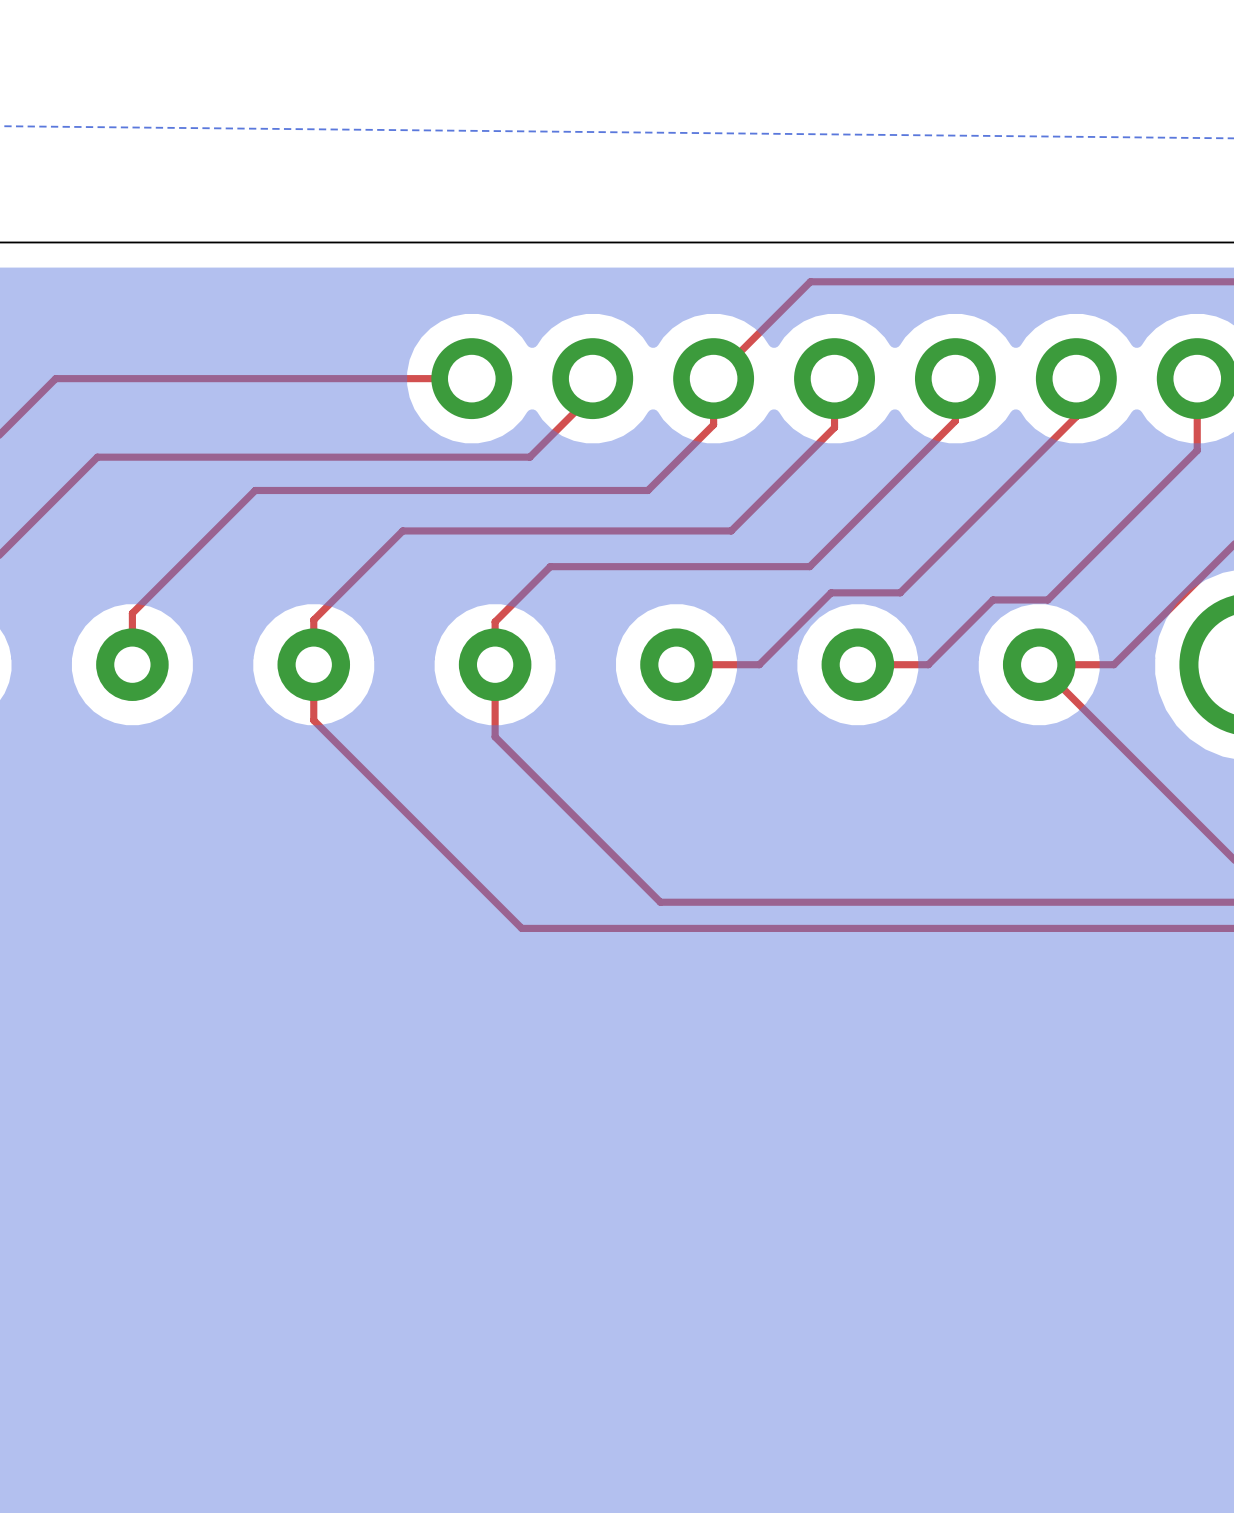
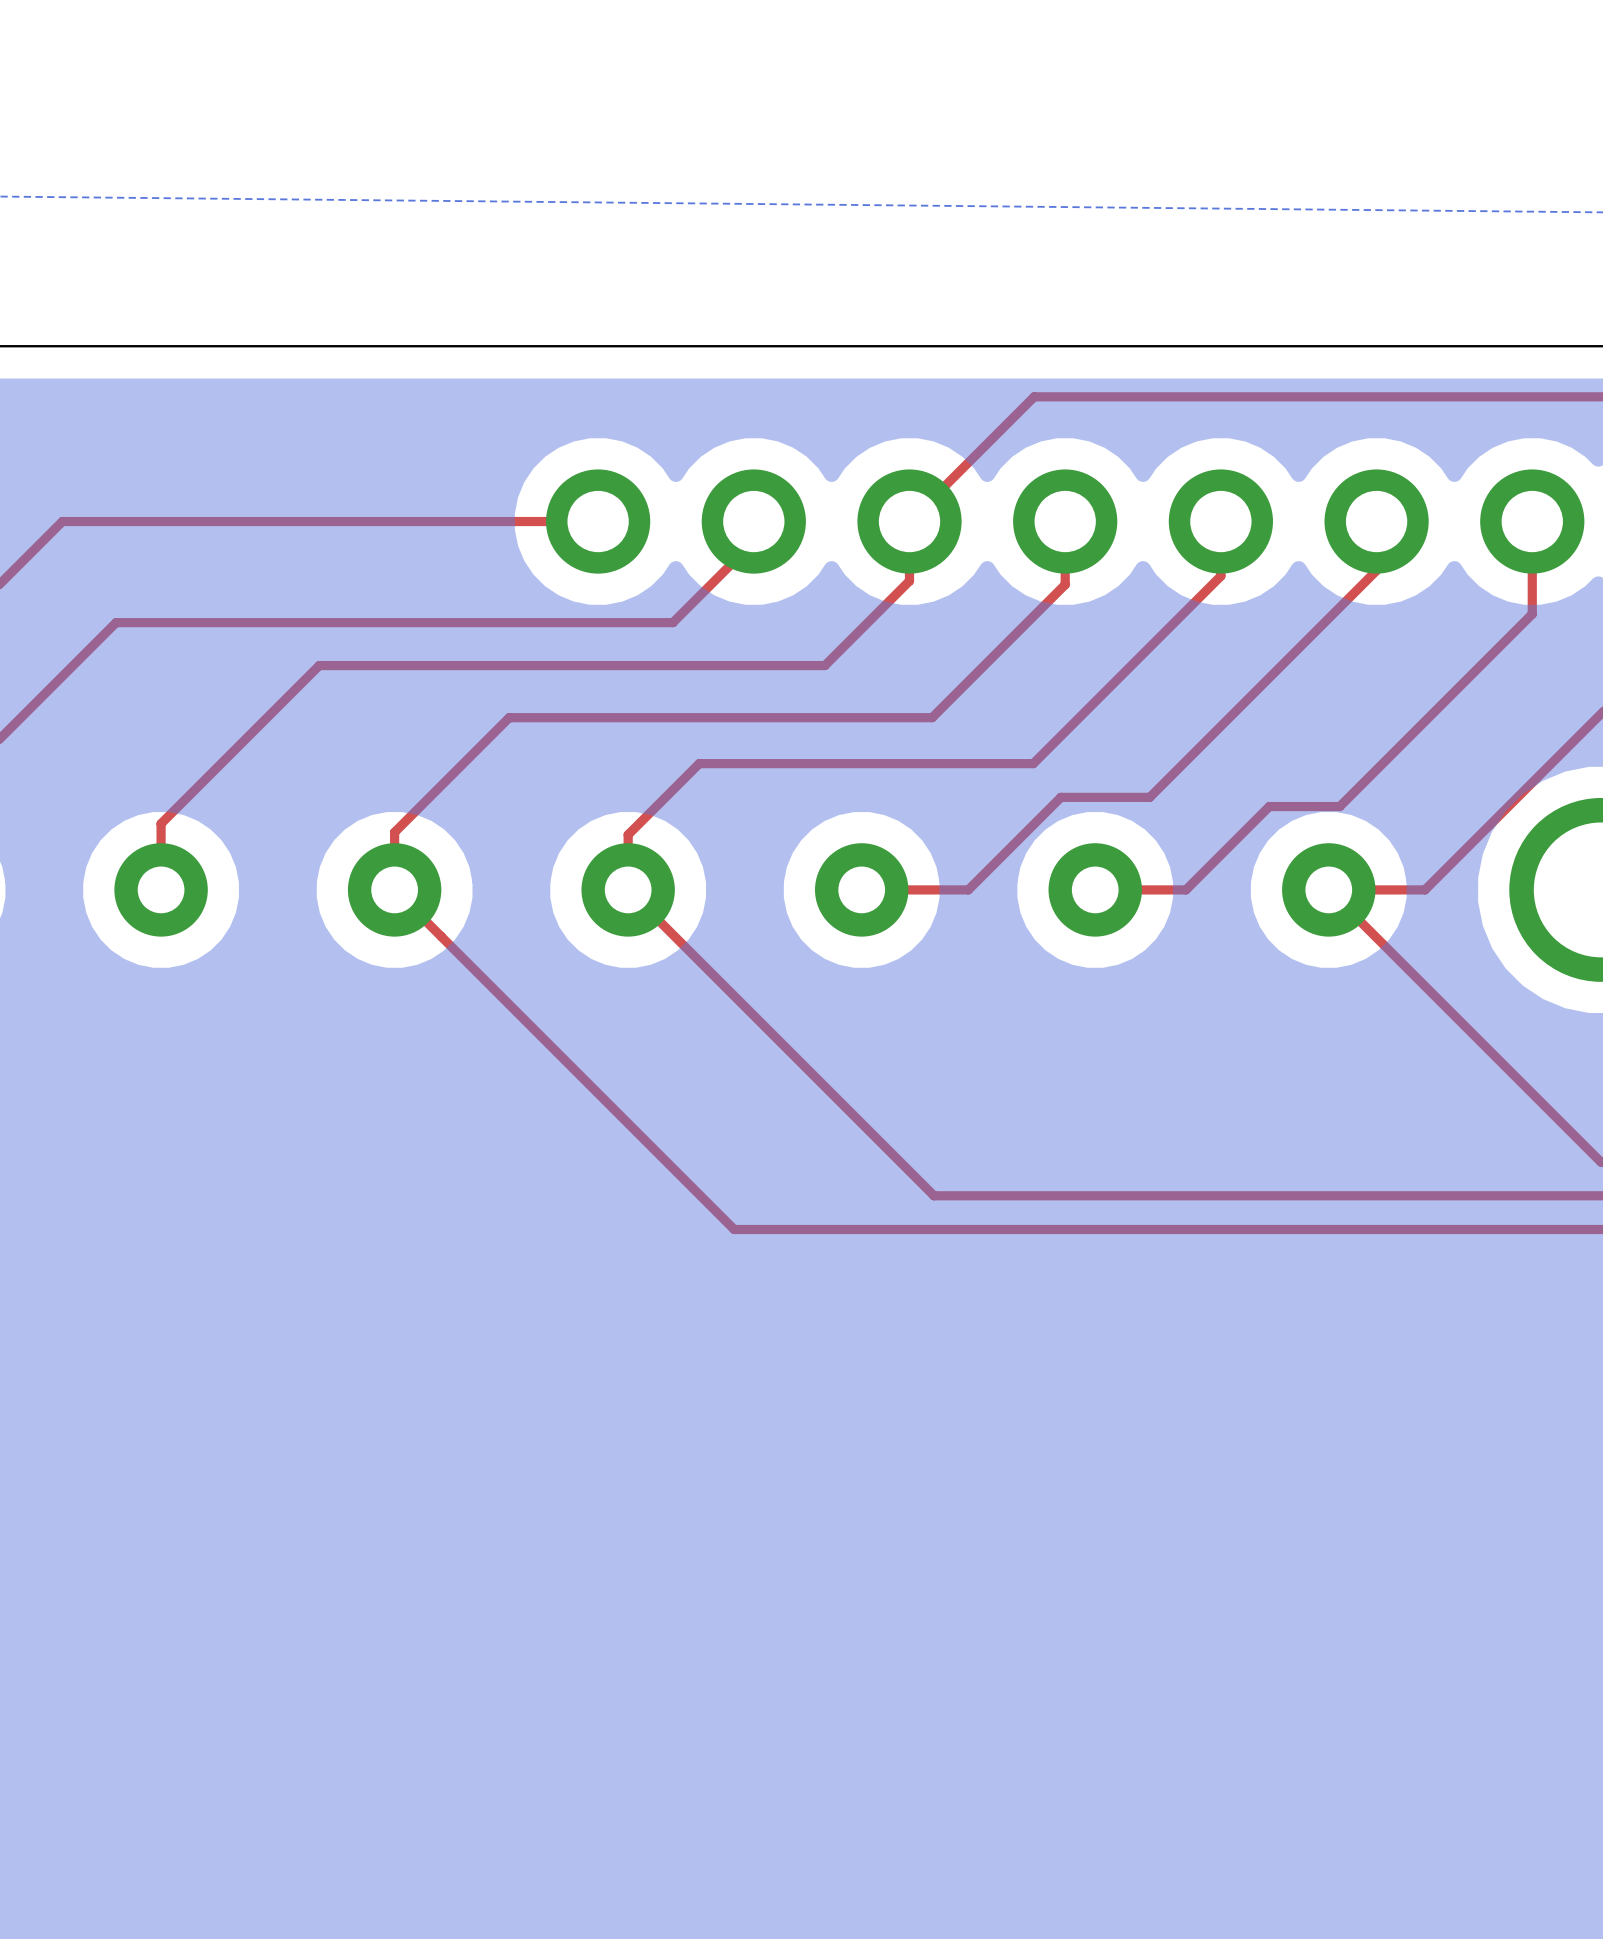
top track: (313, 664) (313, 720) (521, 928) (577, 928) -> (394, 889) (734, 1229)
top track: (495, 664) (495, 736) (660, 902) (732, 902) -> (628, 889) (934, 1195)

